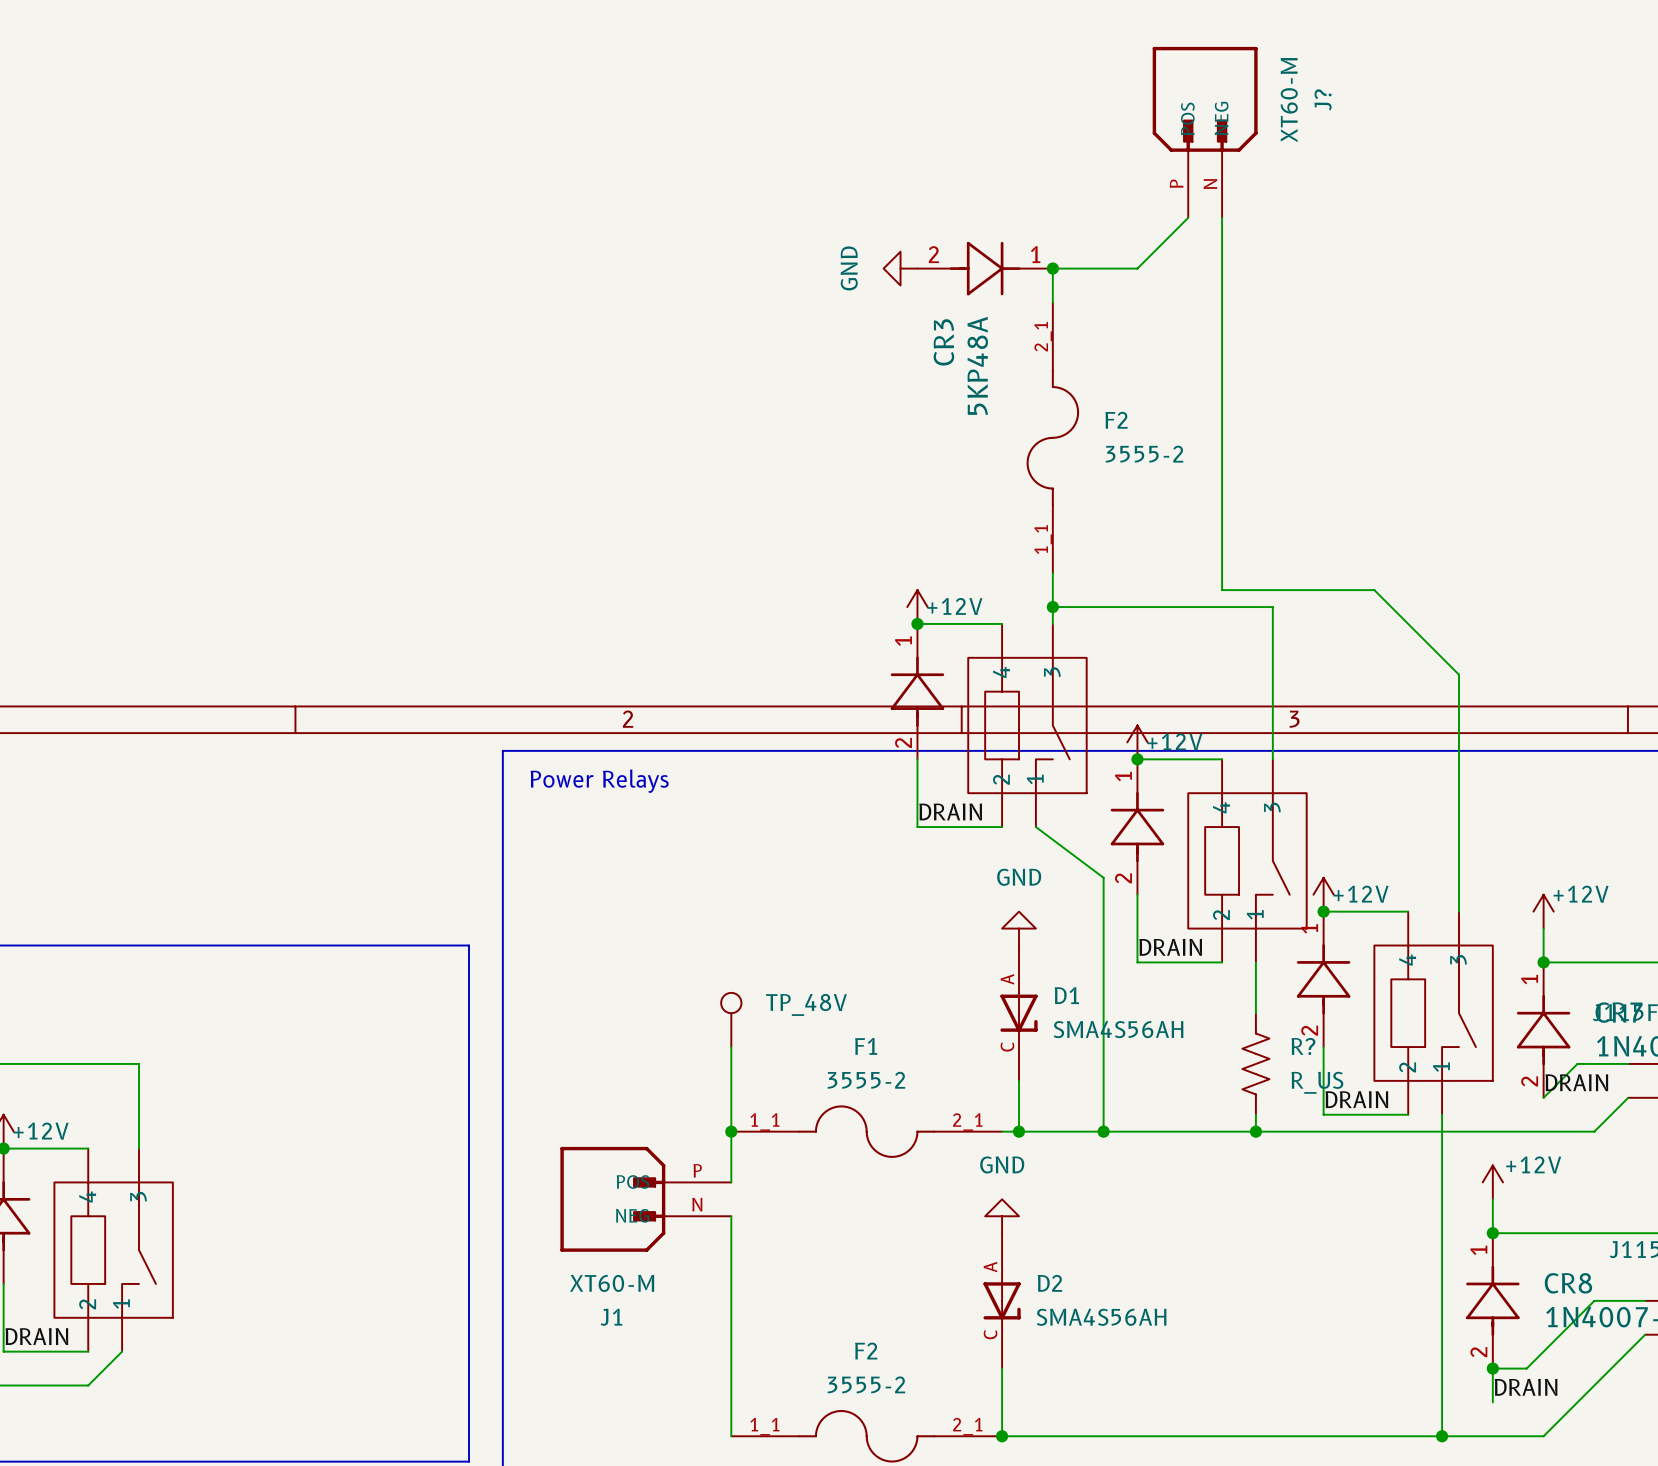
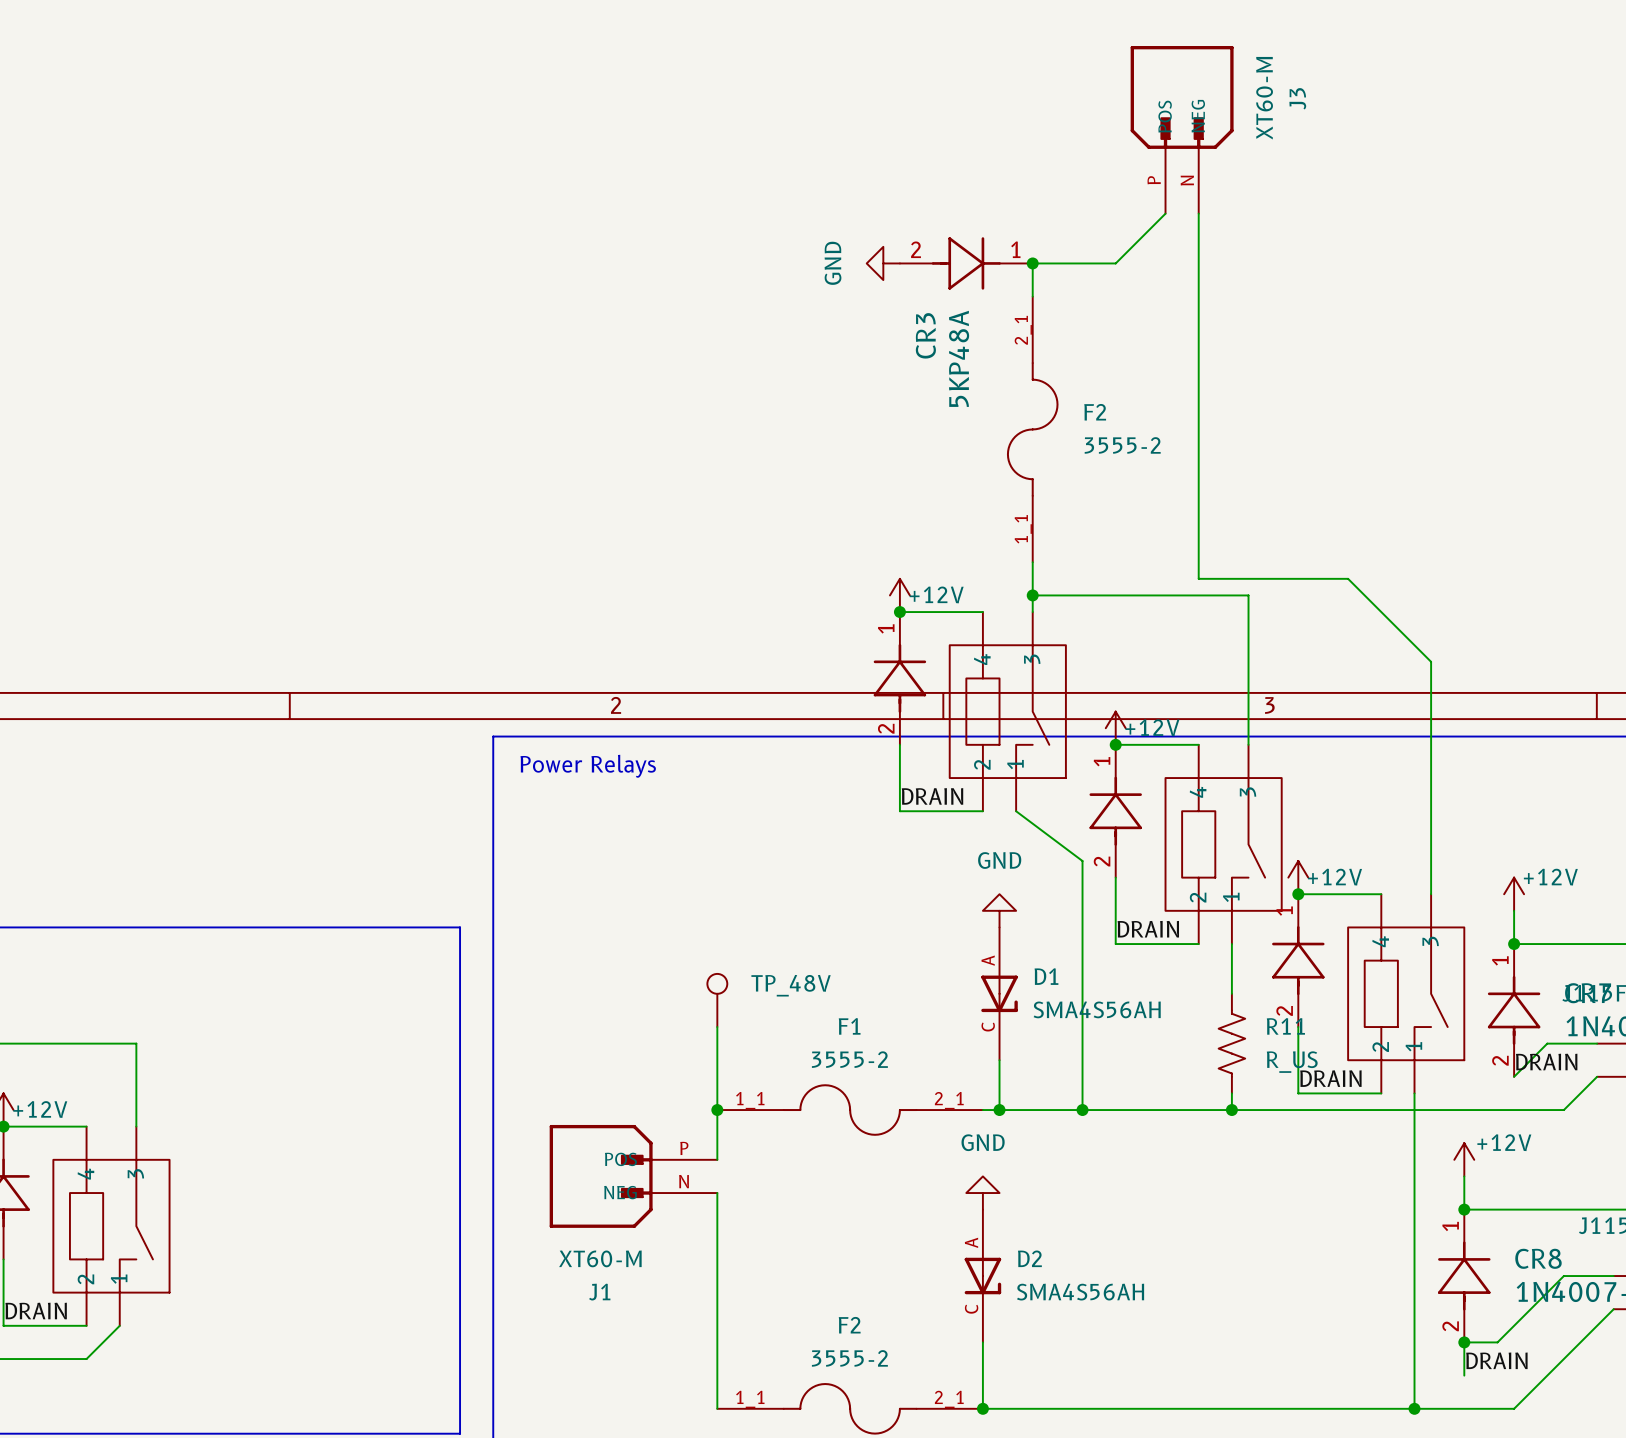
J? name: J? (1323, 99) -> J3 (1297, 98)
R? name: R? (1303, 1046) -> R11 (1285, 1026)

